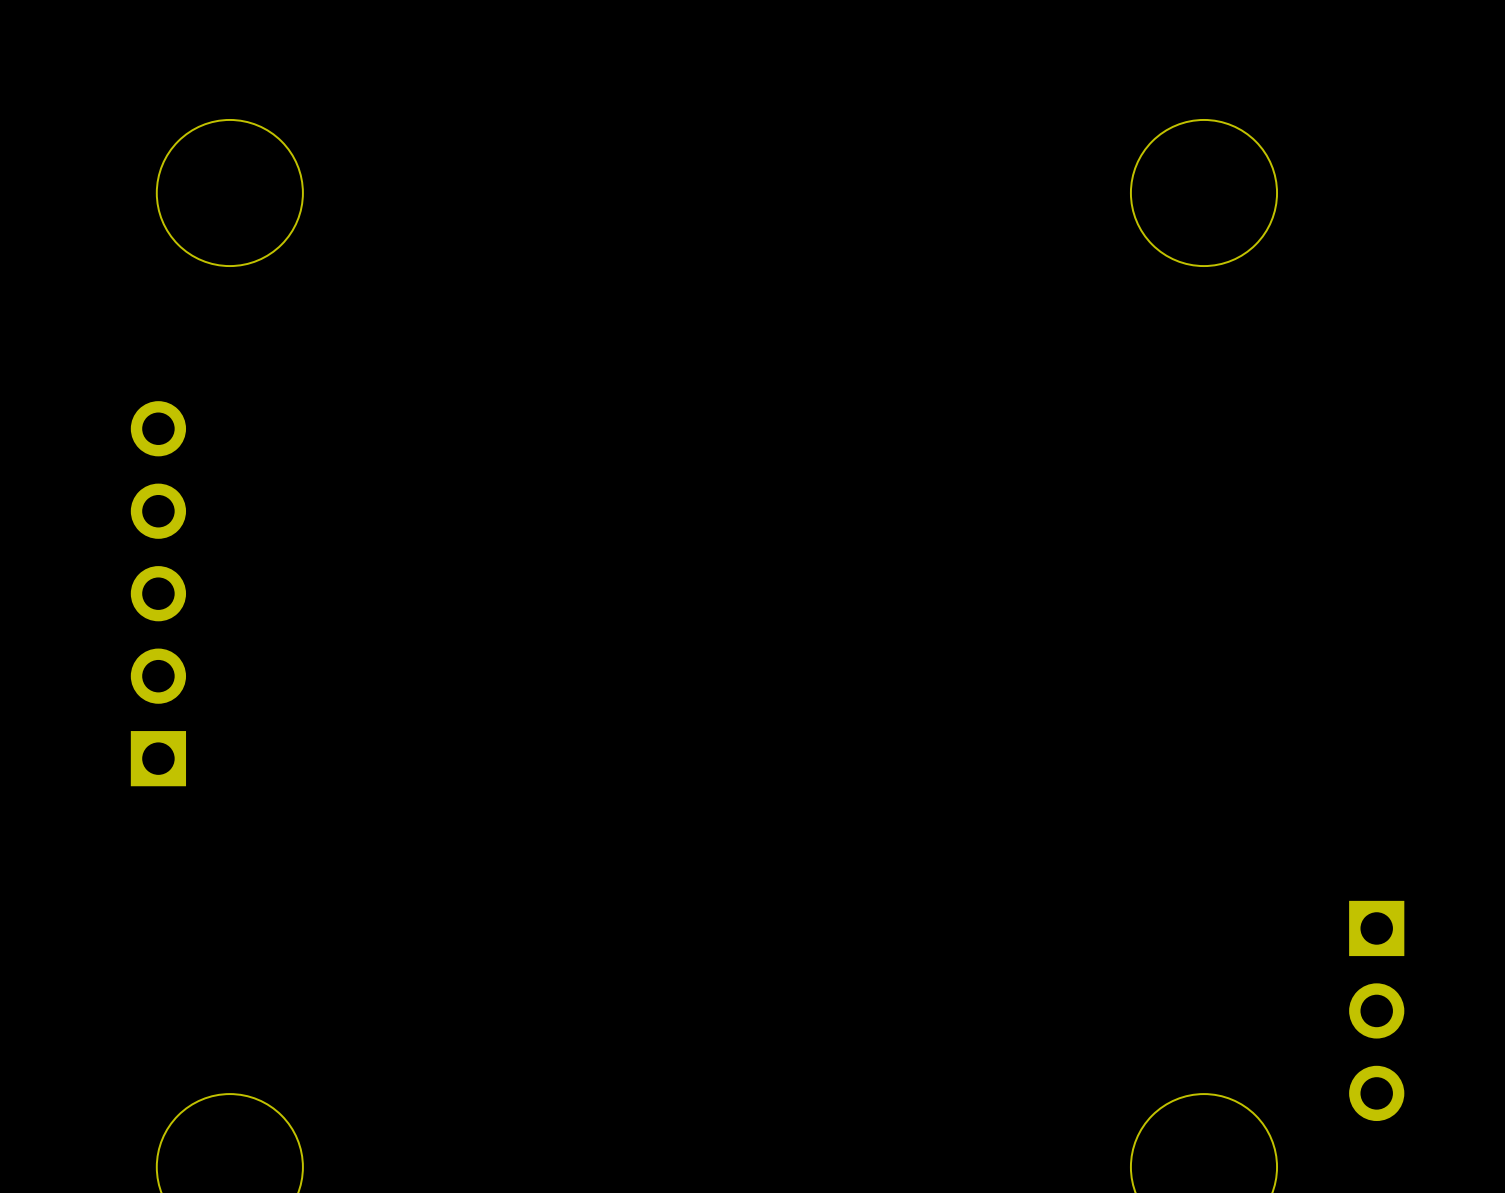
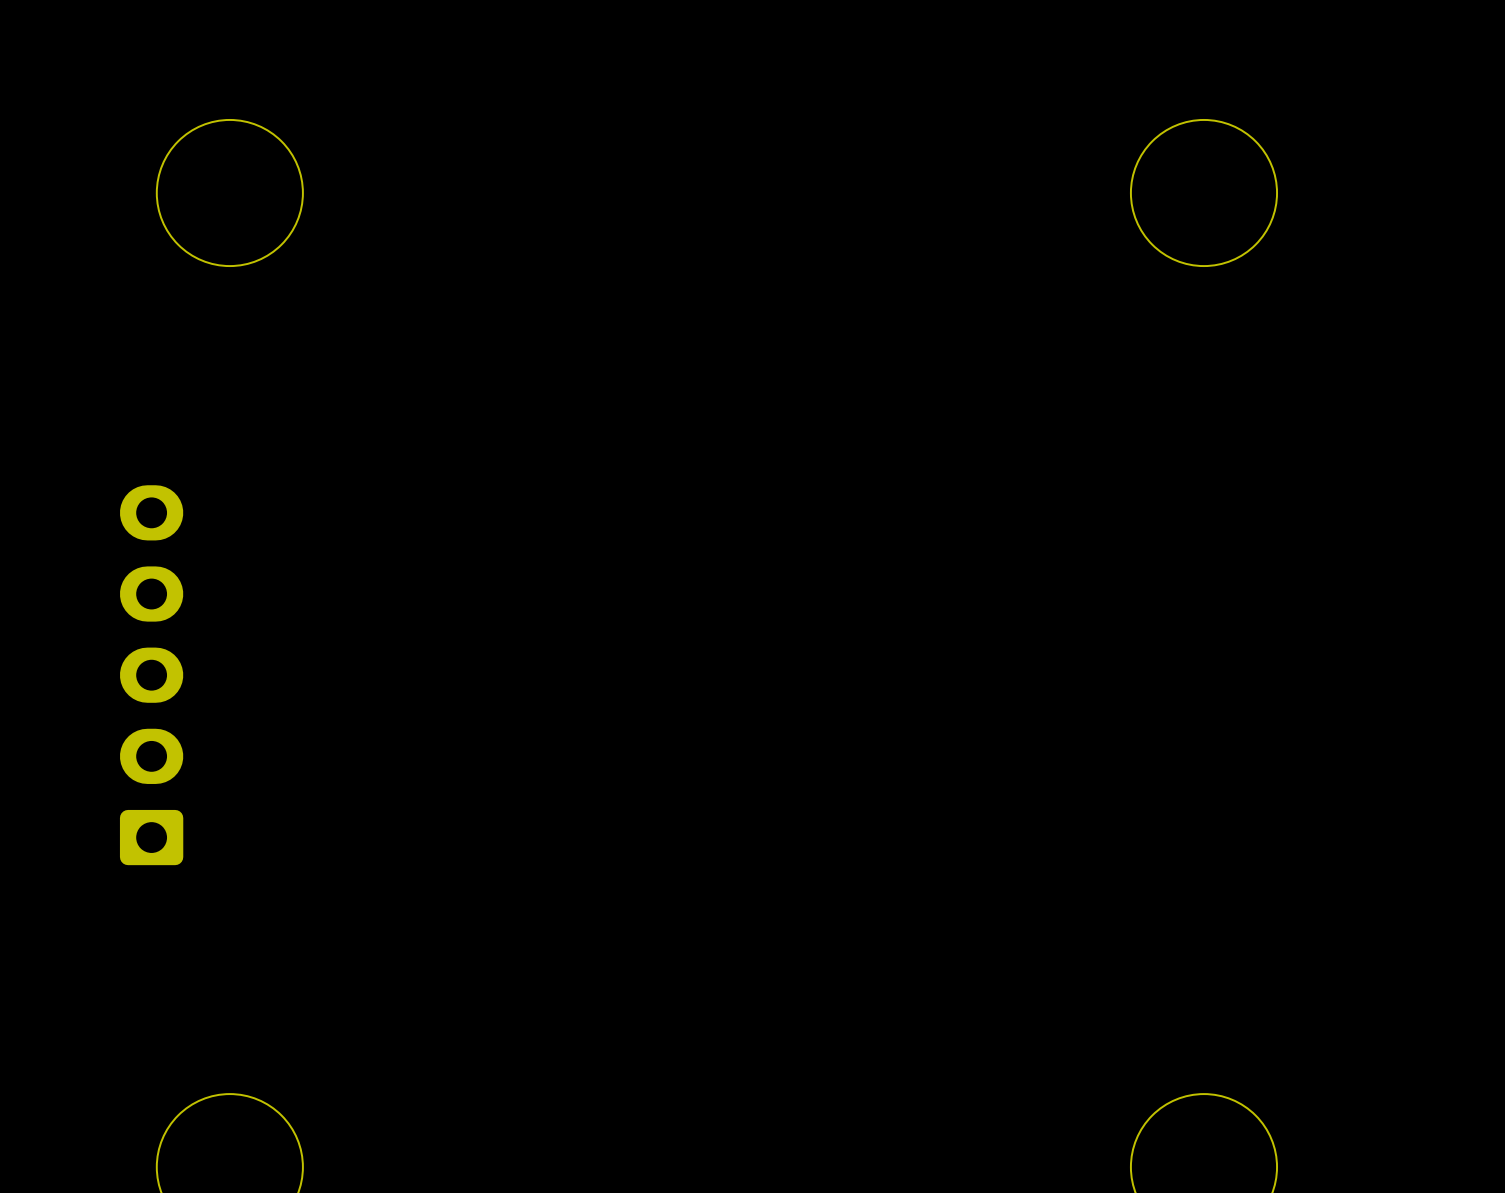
part: (158, 593) -> none
part: none -> (151, 675)
part: (1376, 1010) -> none

